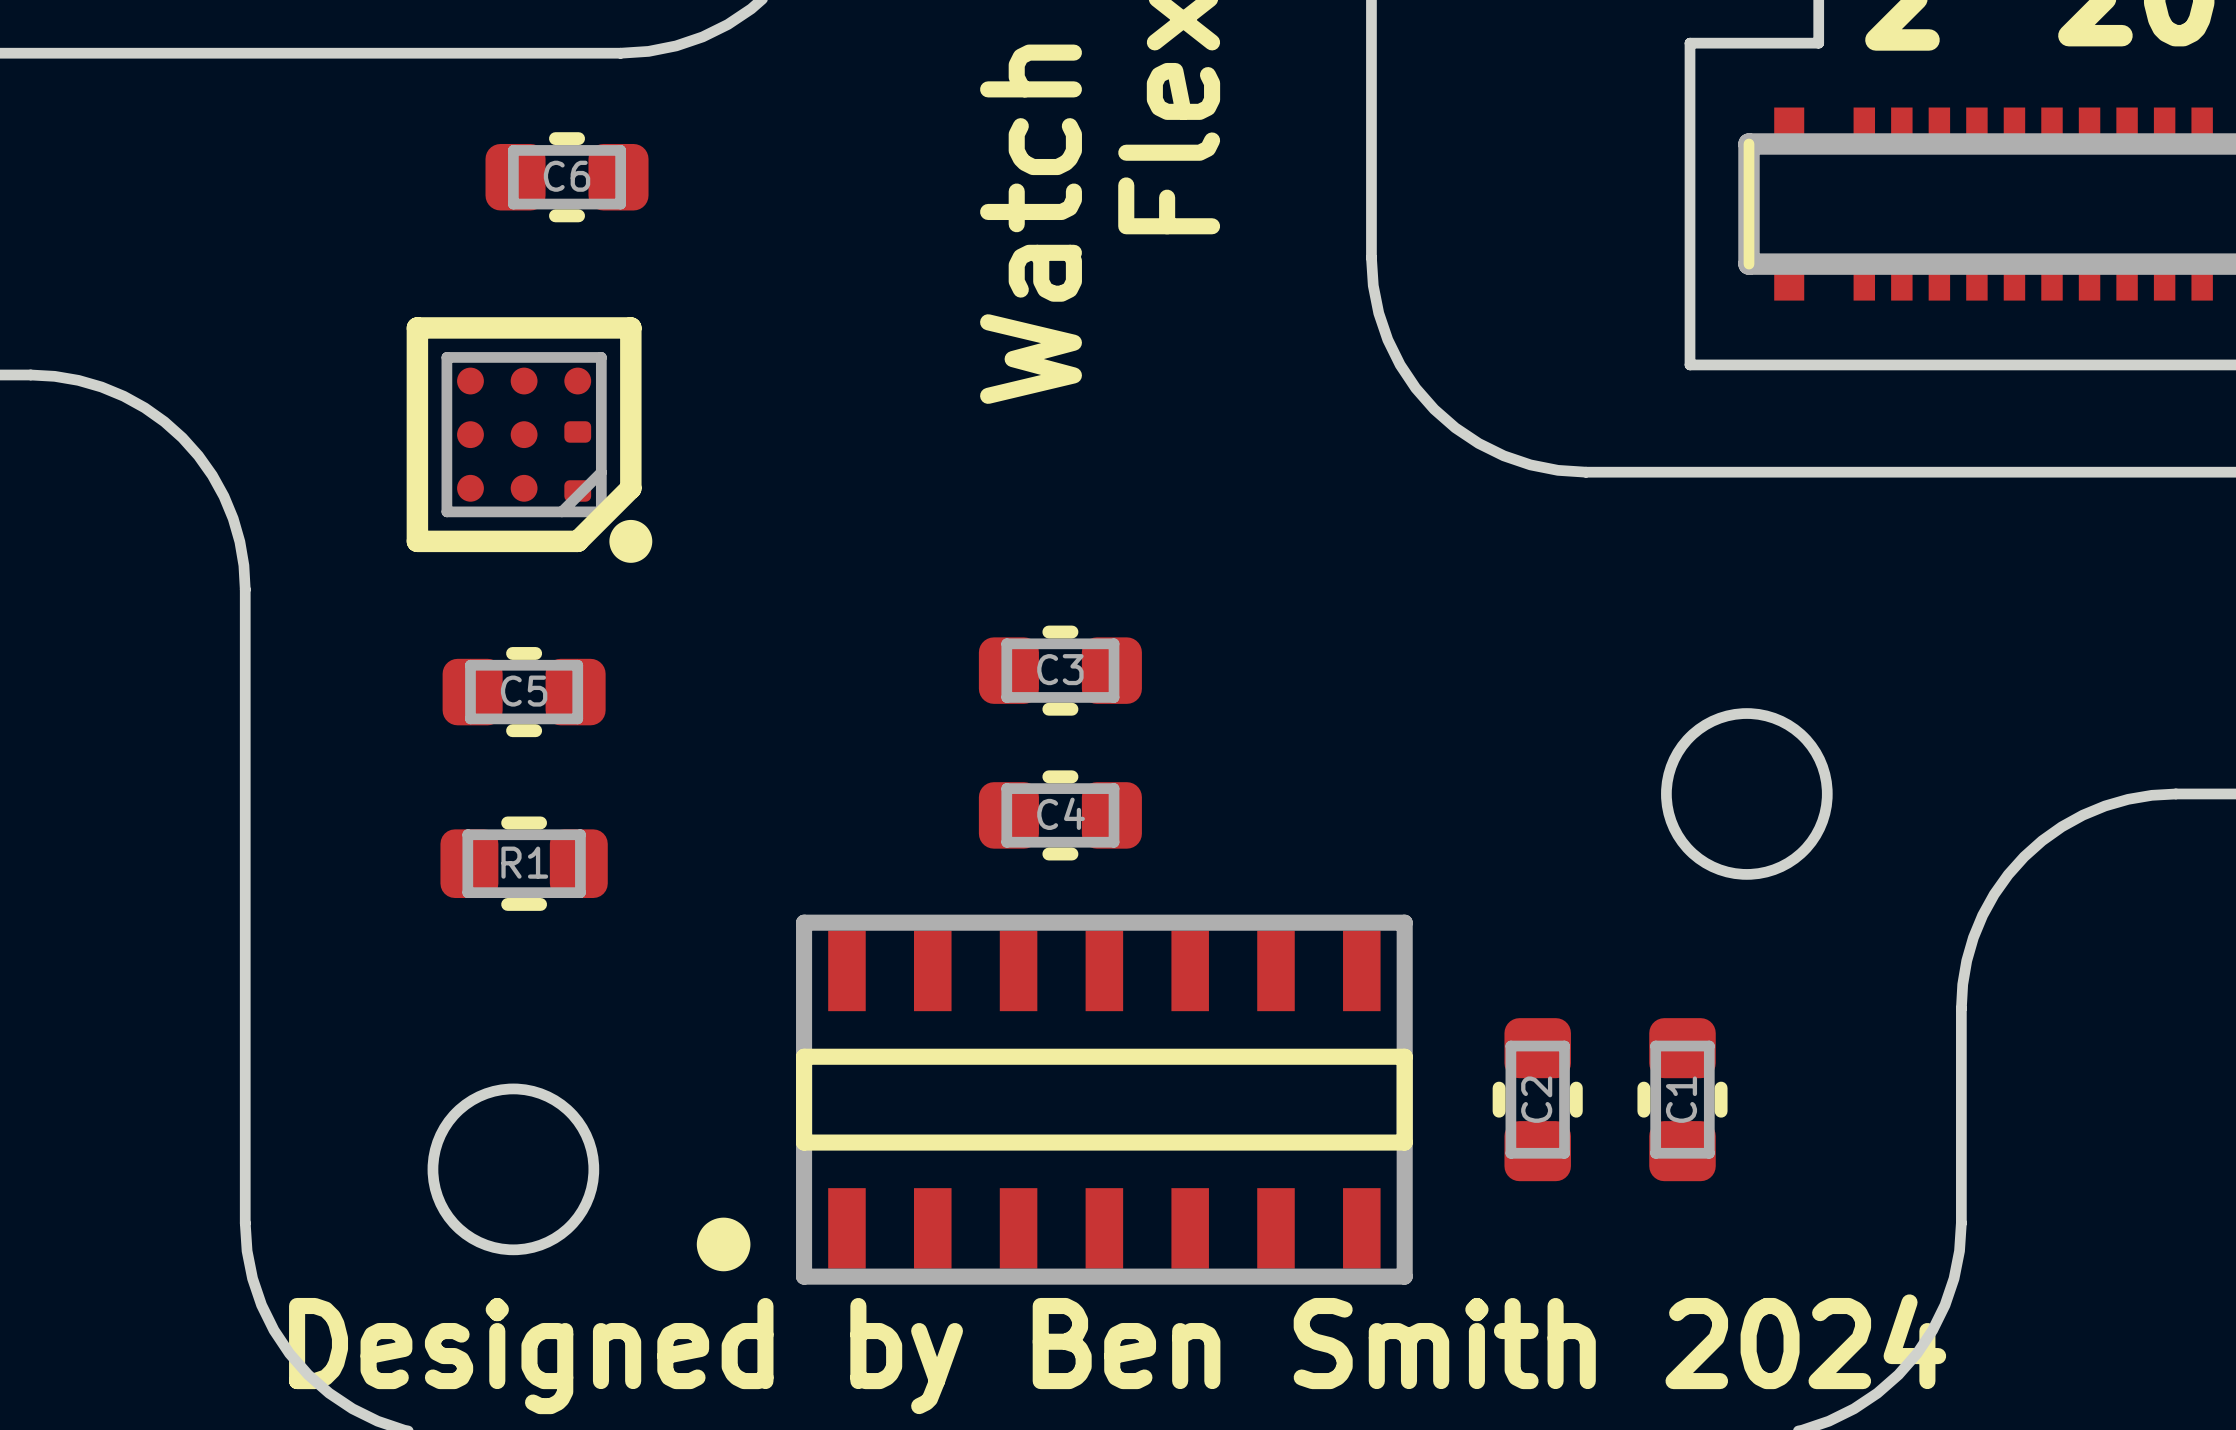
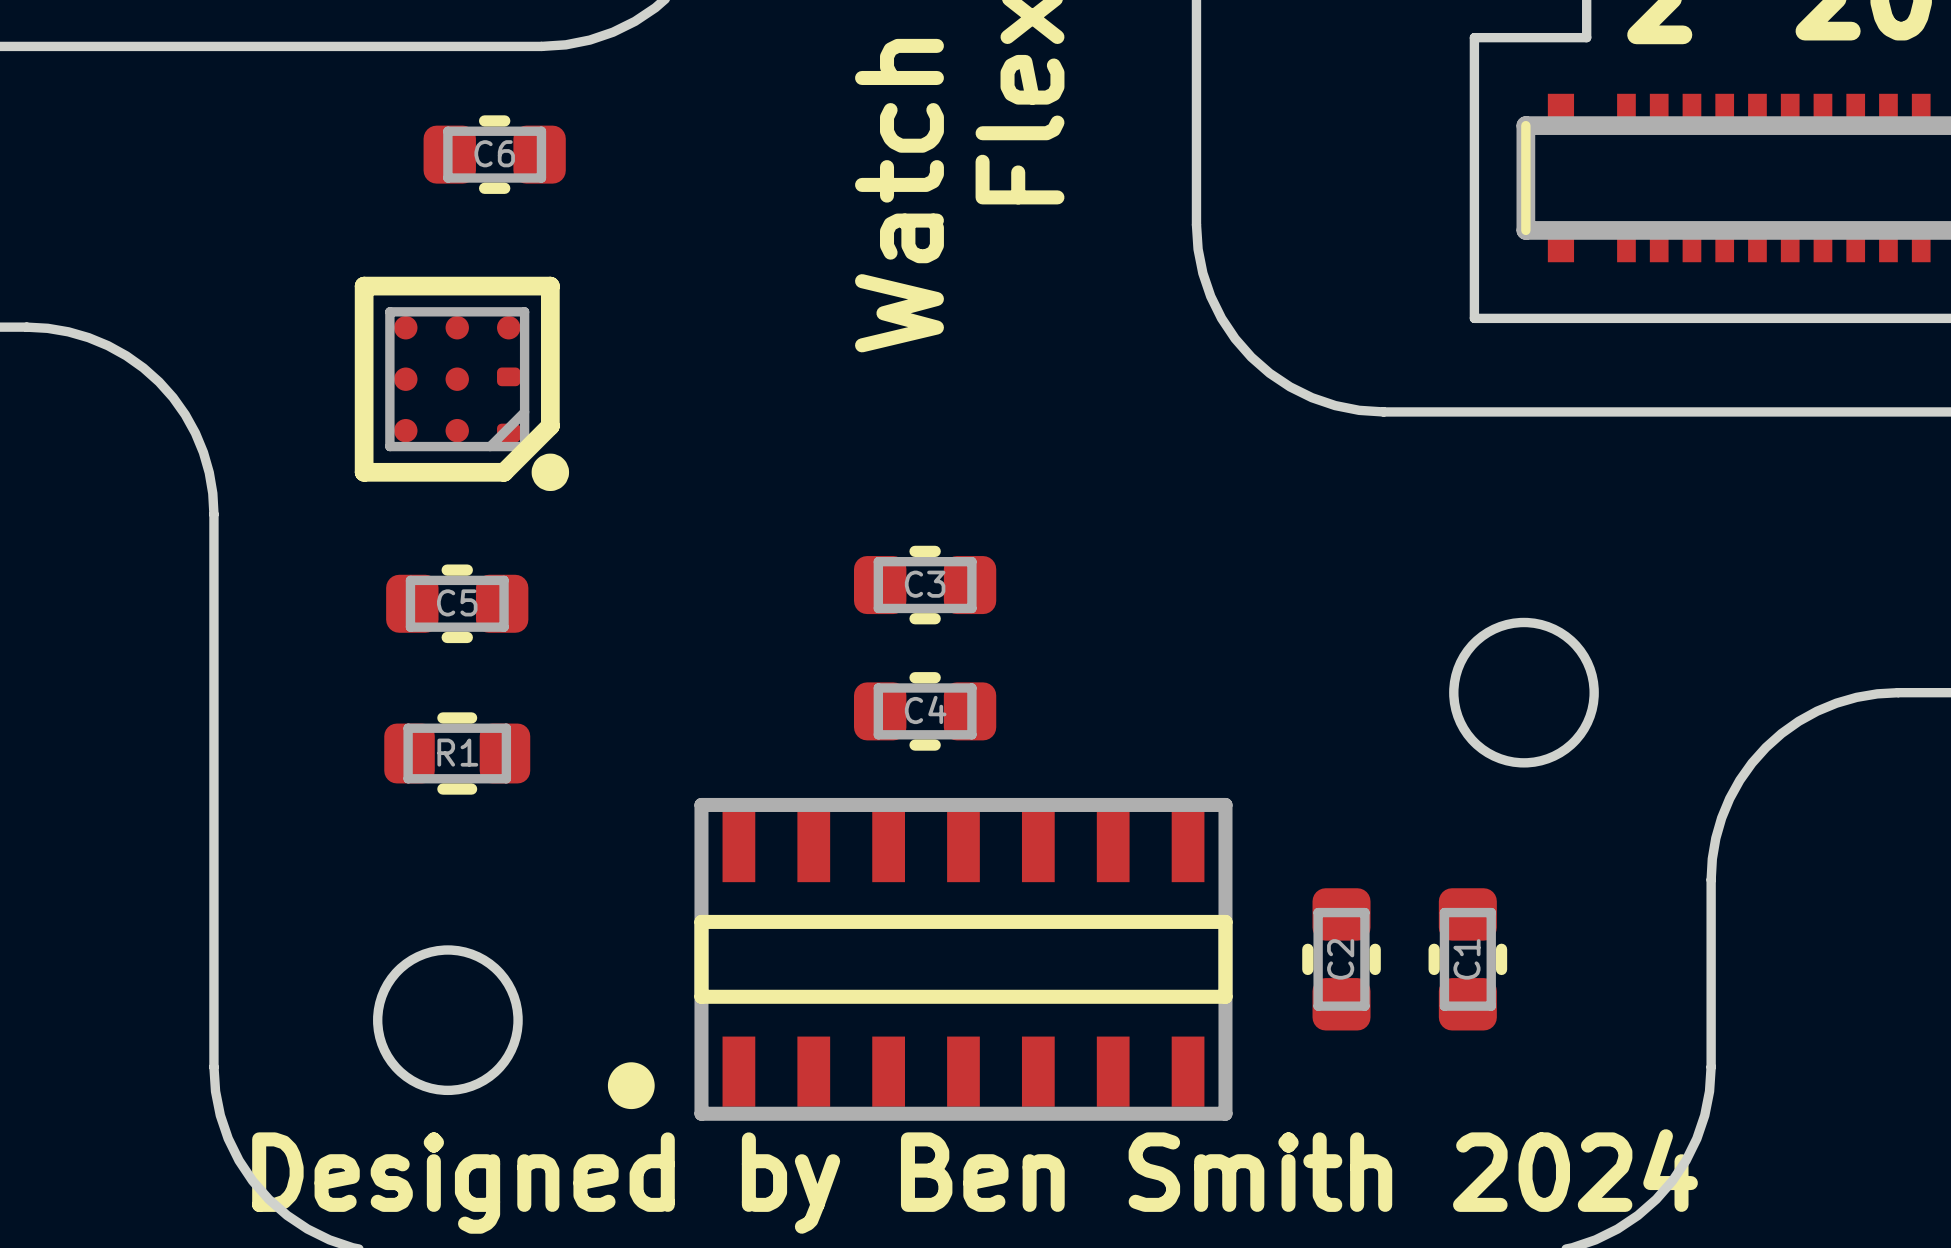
part footprint: [406, 317, 653, 563] -> [354, 276, 570, 492]

